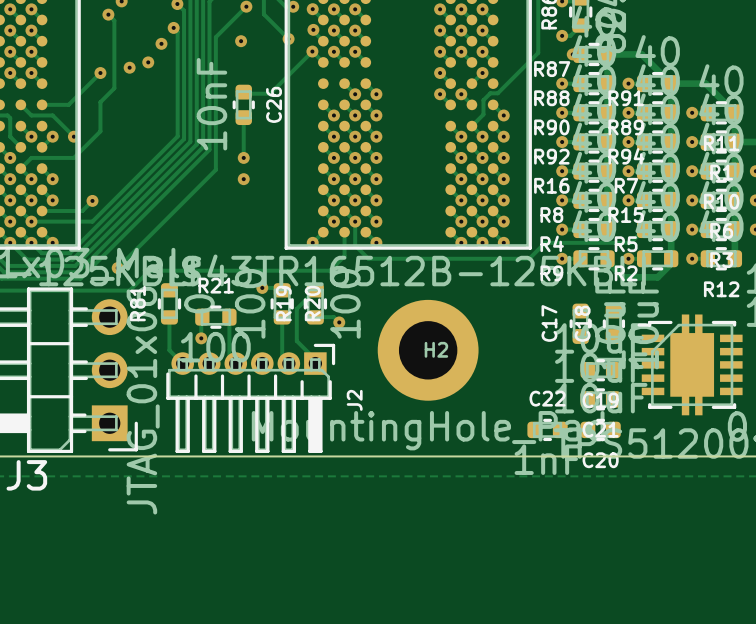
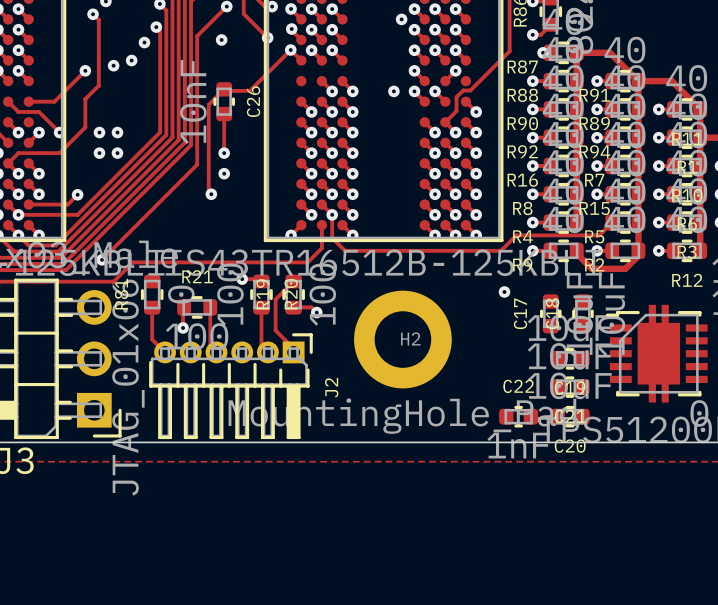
via: none -> (401, 19)
track: none -> (224, 89) (208, 104) (208, 191) (211, 194)
via: none -> (393, 91)
via: none -> (99, 132)
via: none -> (117, 132)
via: none -> (99, 153)
via: none -> (117, 153)
via: none -> (211, 194)
via: none -> (504, 291)

